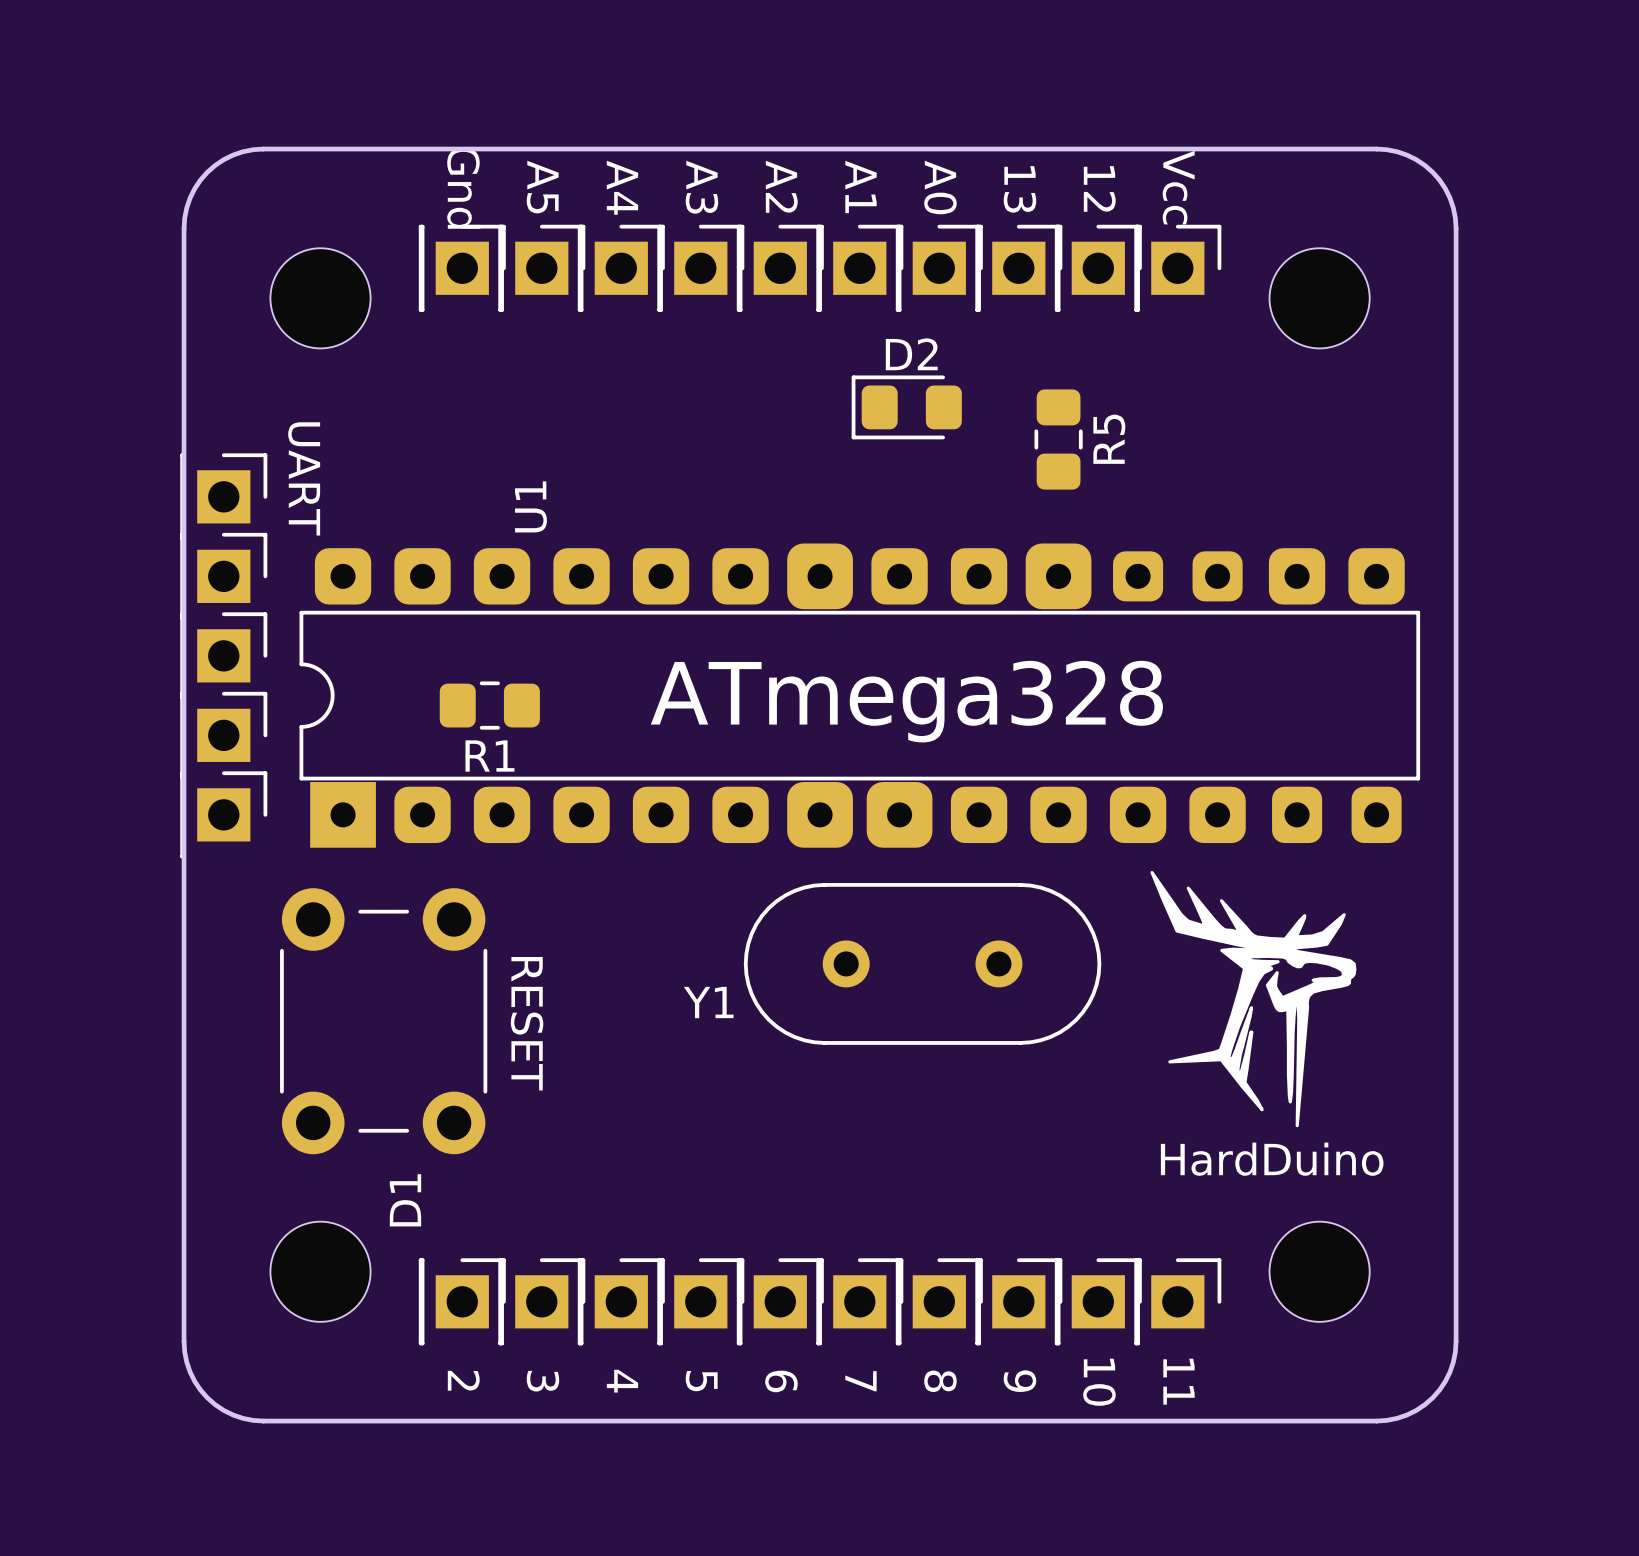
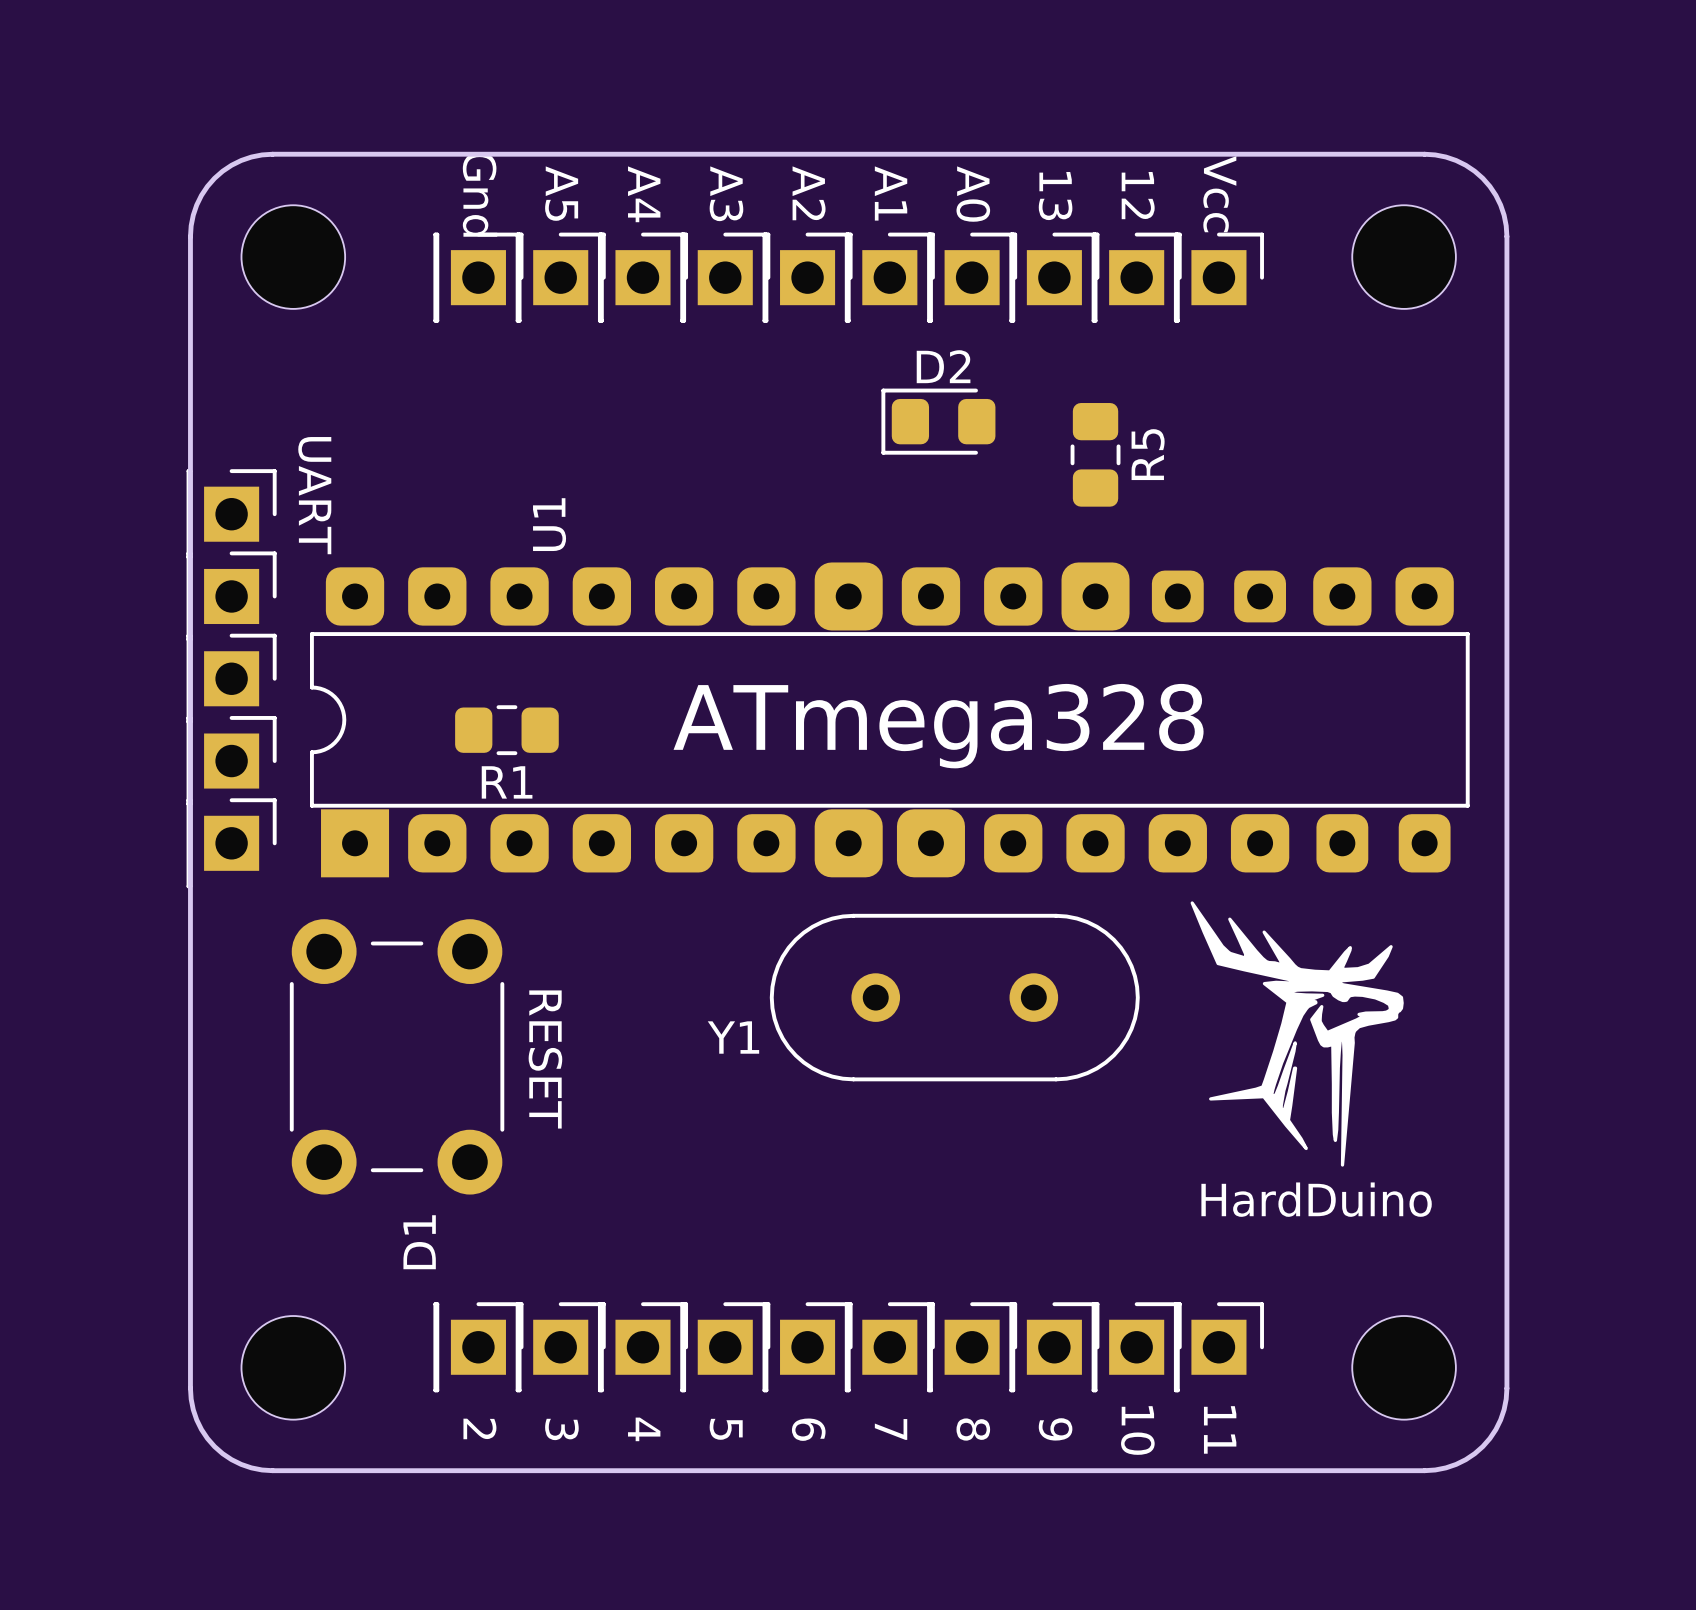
part position: (320, 298) -> (293, 257)
part position: (1319, 298) -> (1404, 257)
part position: (320, 1271) -> (293, 1367)
part position: (1319, 1271) -> (1404, 1367)

